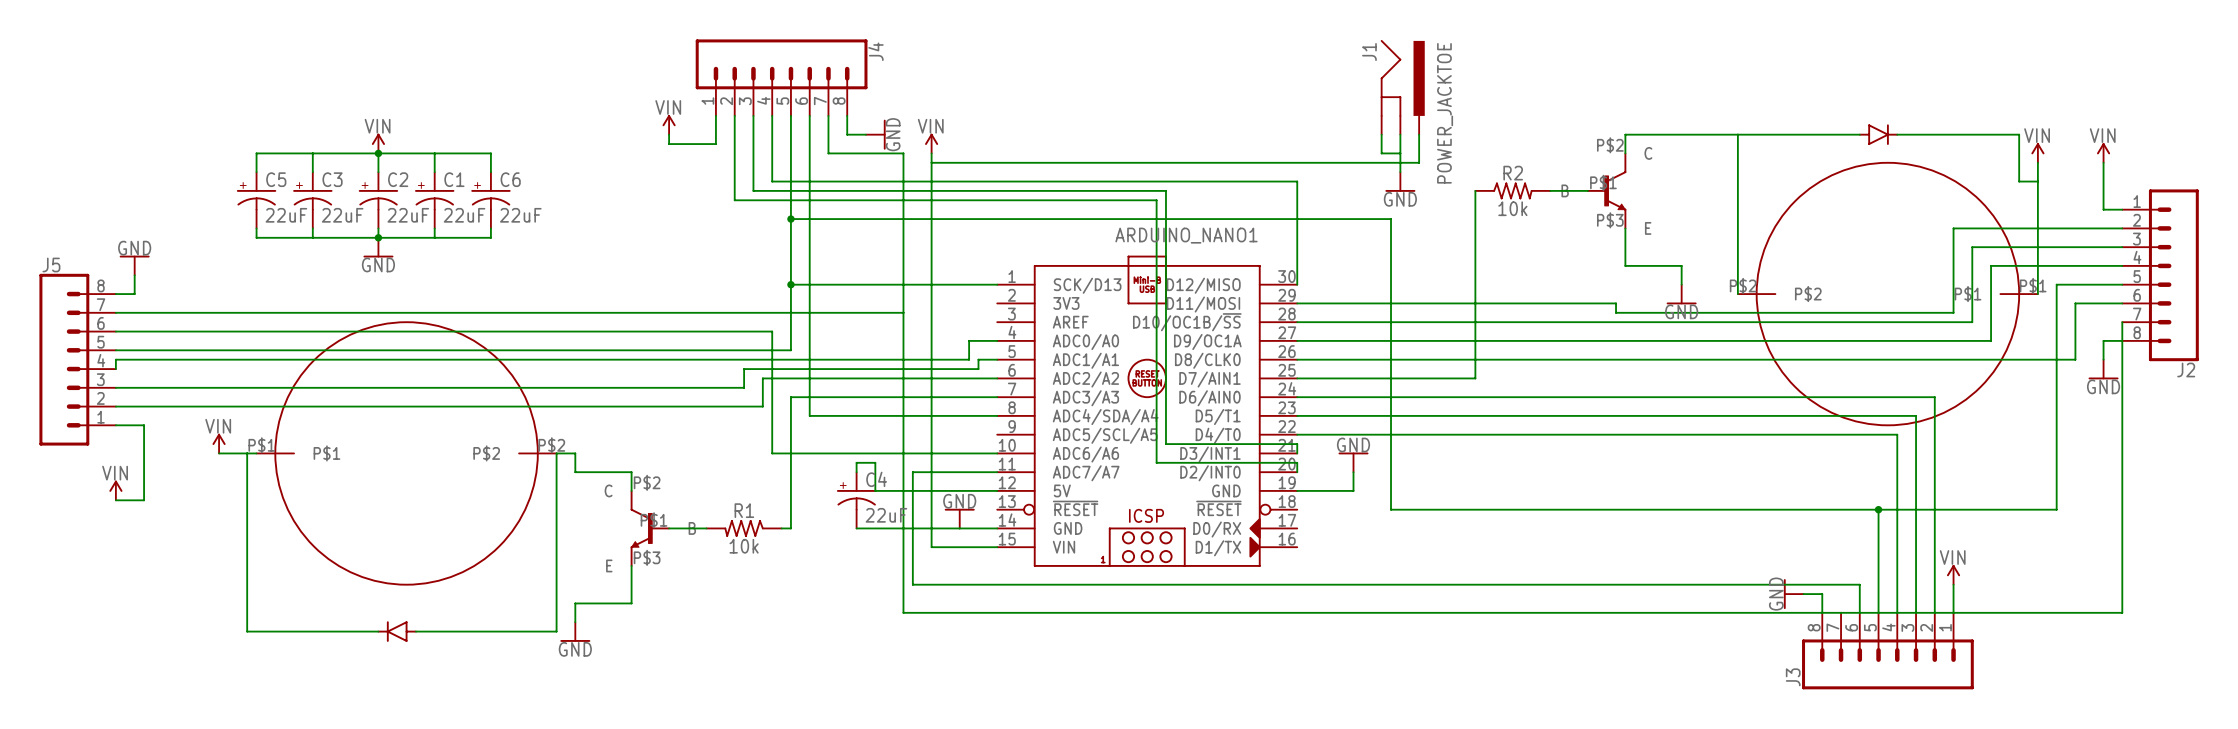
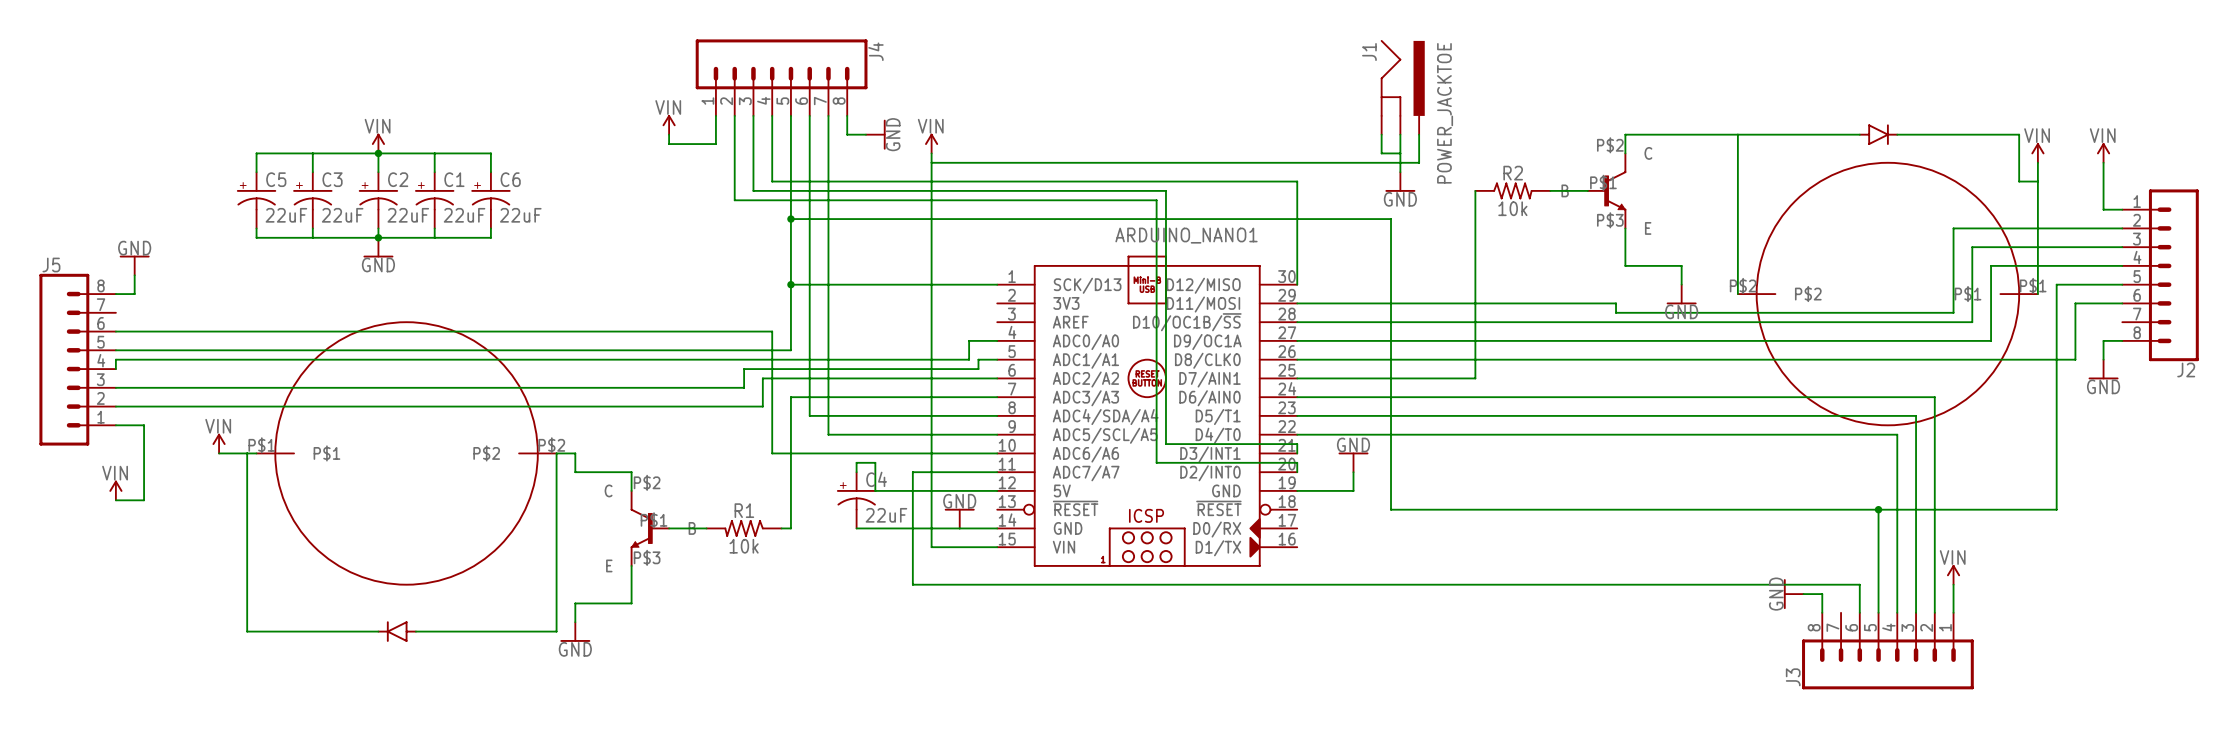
wire: (828, 153) (903, 153) (903, 612) (2122, 612) (2122, 322) -> (828, 153) (828, 434) (997, 434)
wire: (115, 312) (903, 312) -> none

